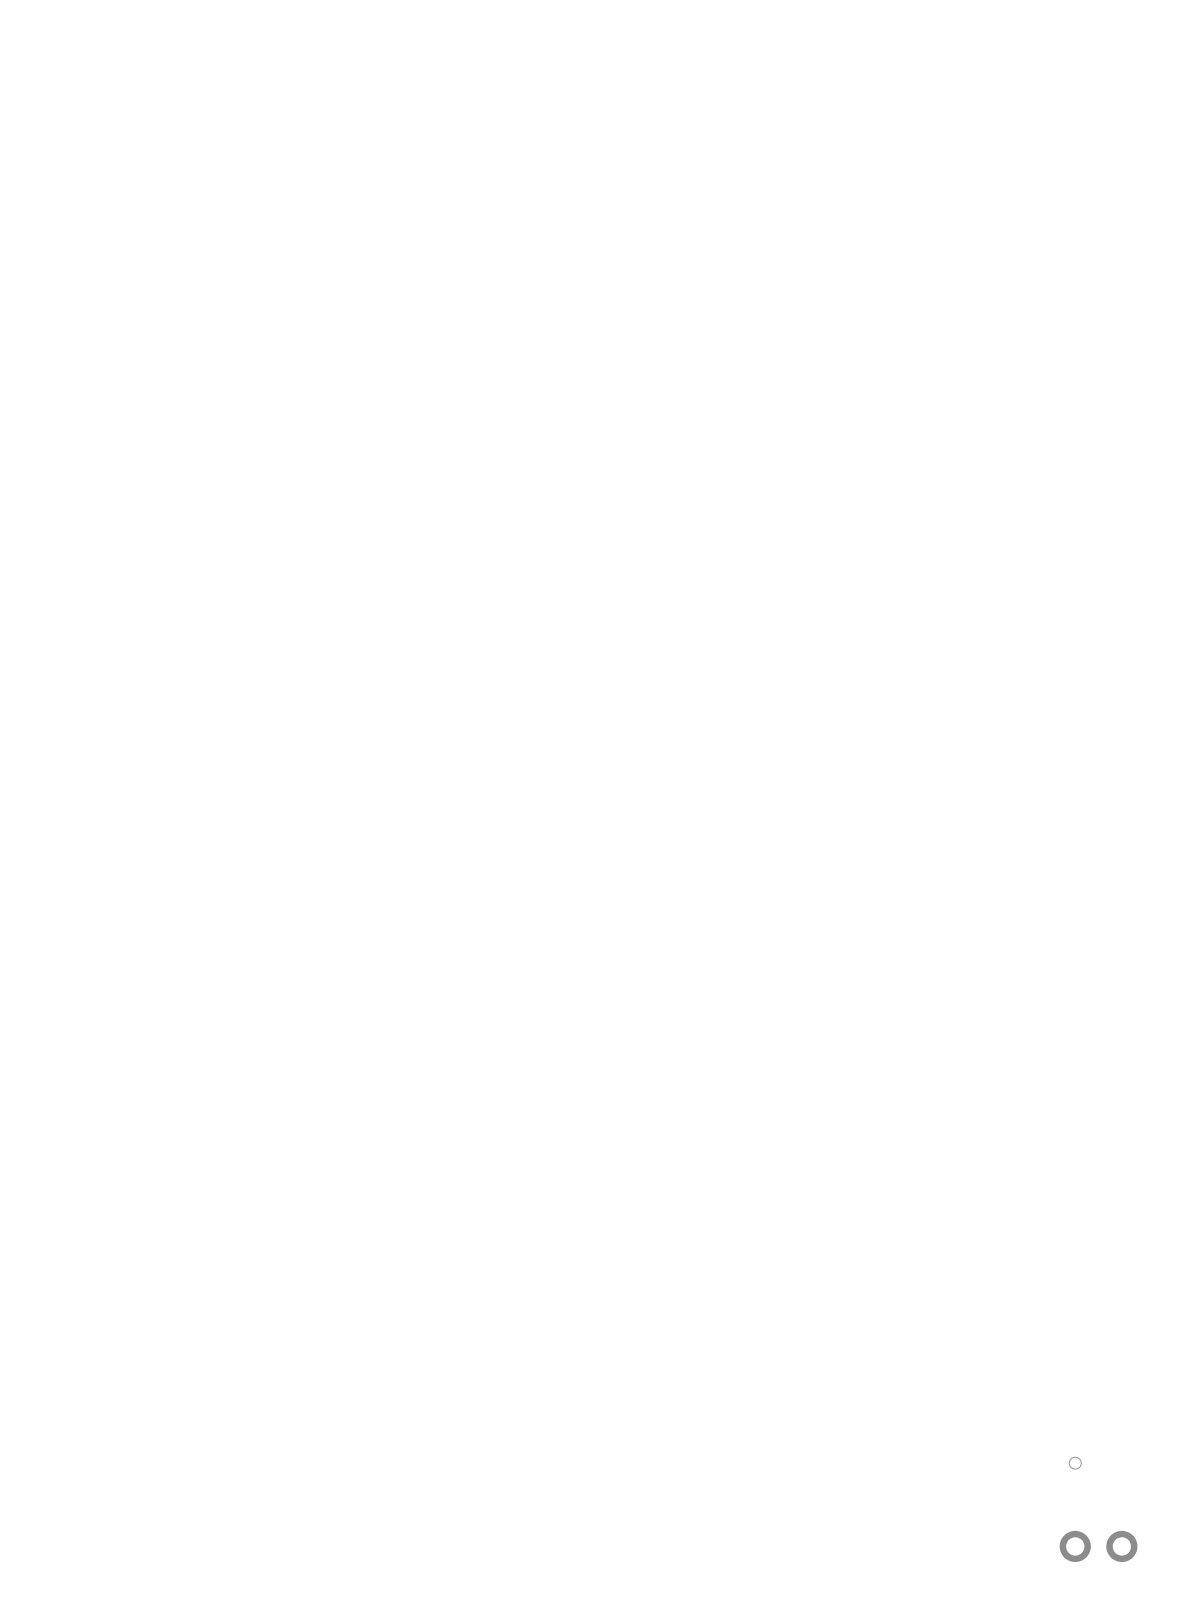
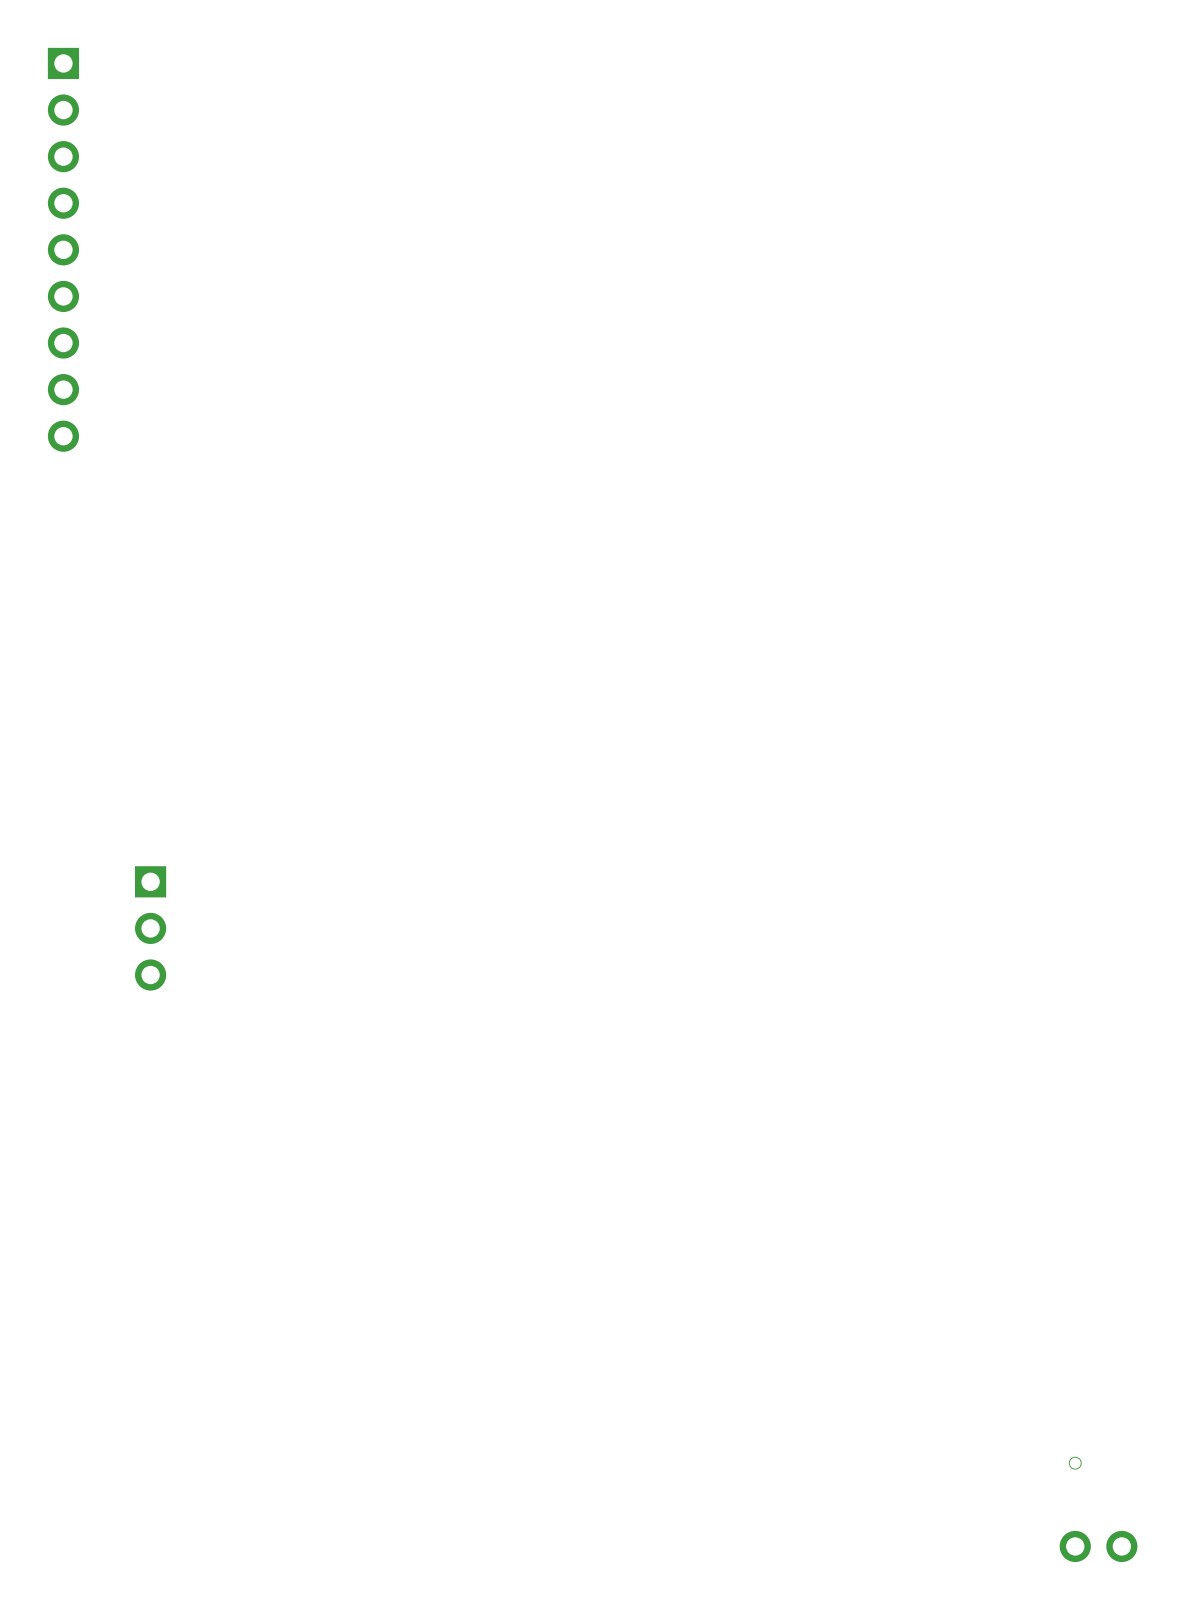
part: none -> (63, 249)
part: none -> (150, 928)

